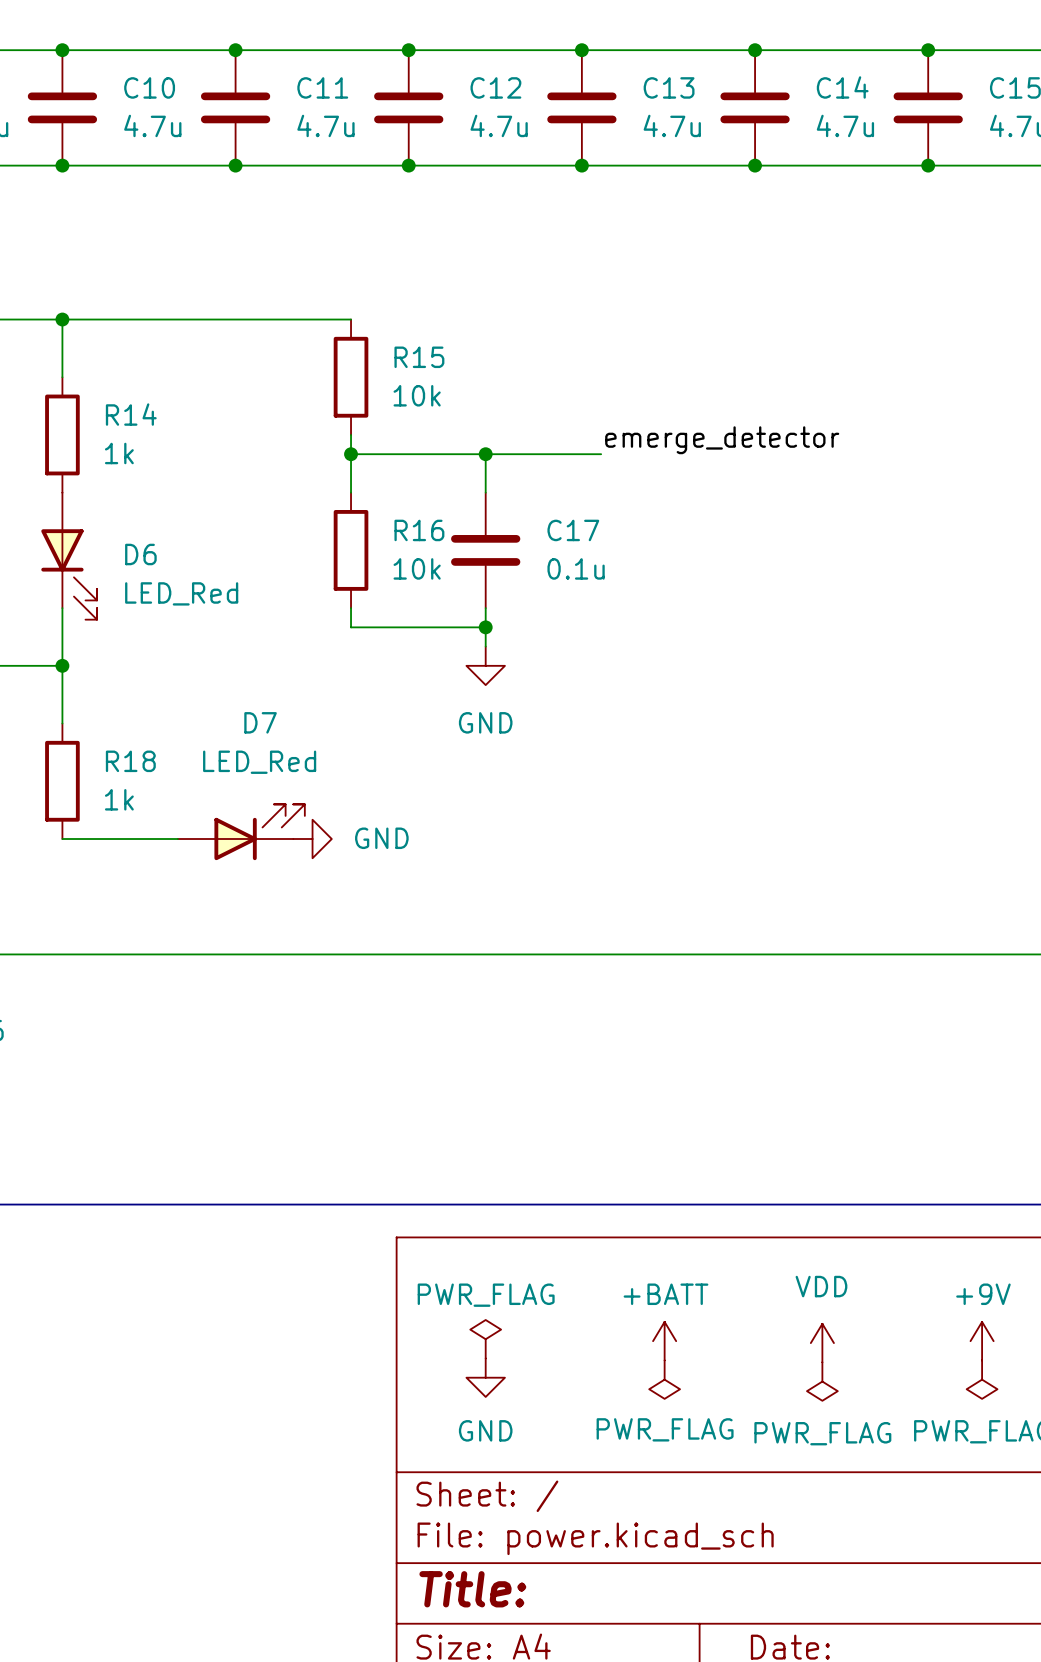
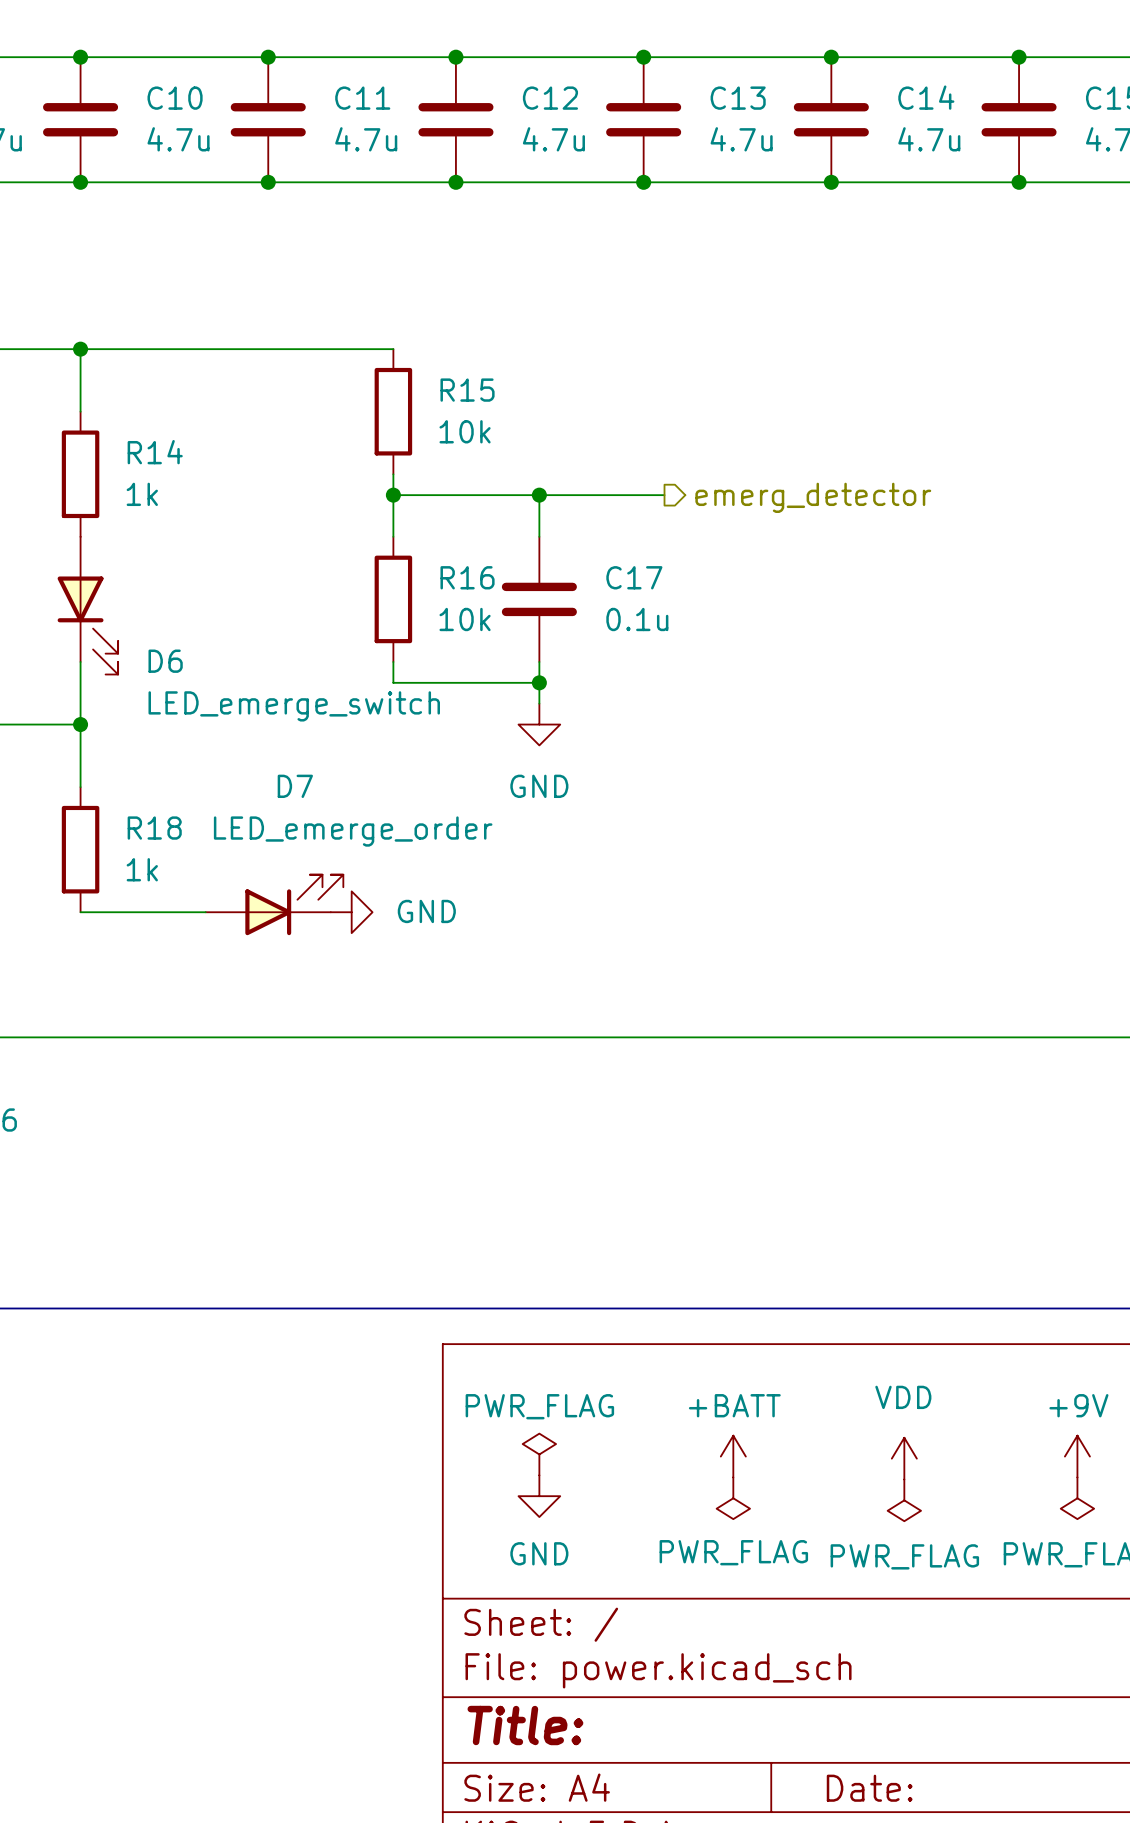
label: emerge_detector (722, 440) -> none
hierarchical label: none -> emerg_detector (813, 497)
D6 name position: D6 (140, 554) -> D6 (165, 661)
D6 value: LED_Red (181, 593) -> LED_emerge_switch (294, 706)
D7 value: LED_Red (259, 762) -> LED_emerge_order (353, 831)

